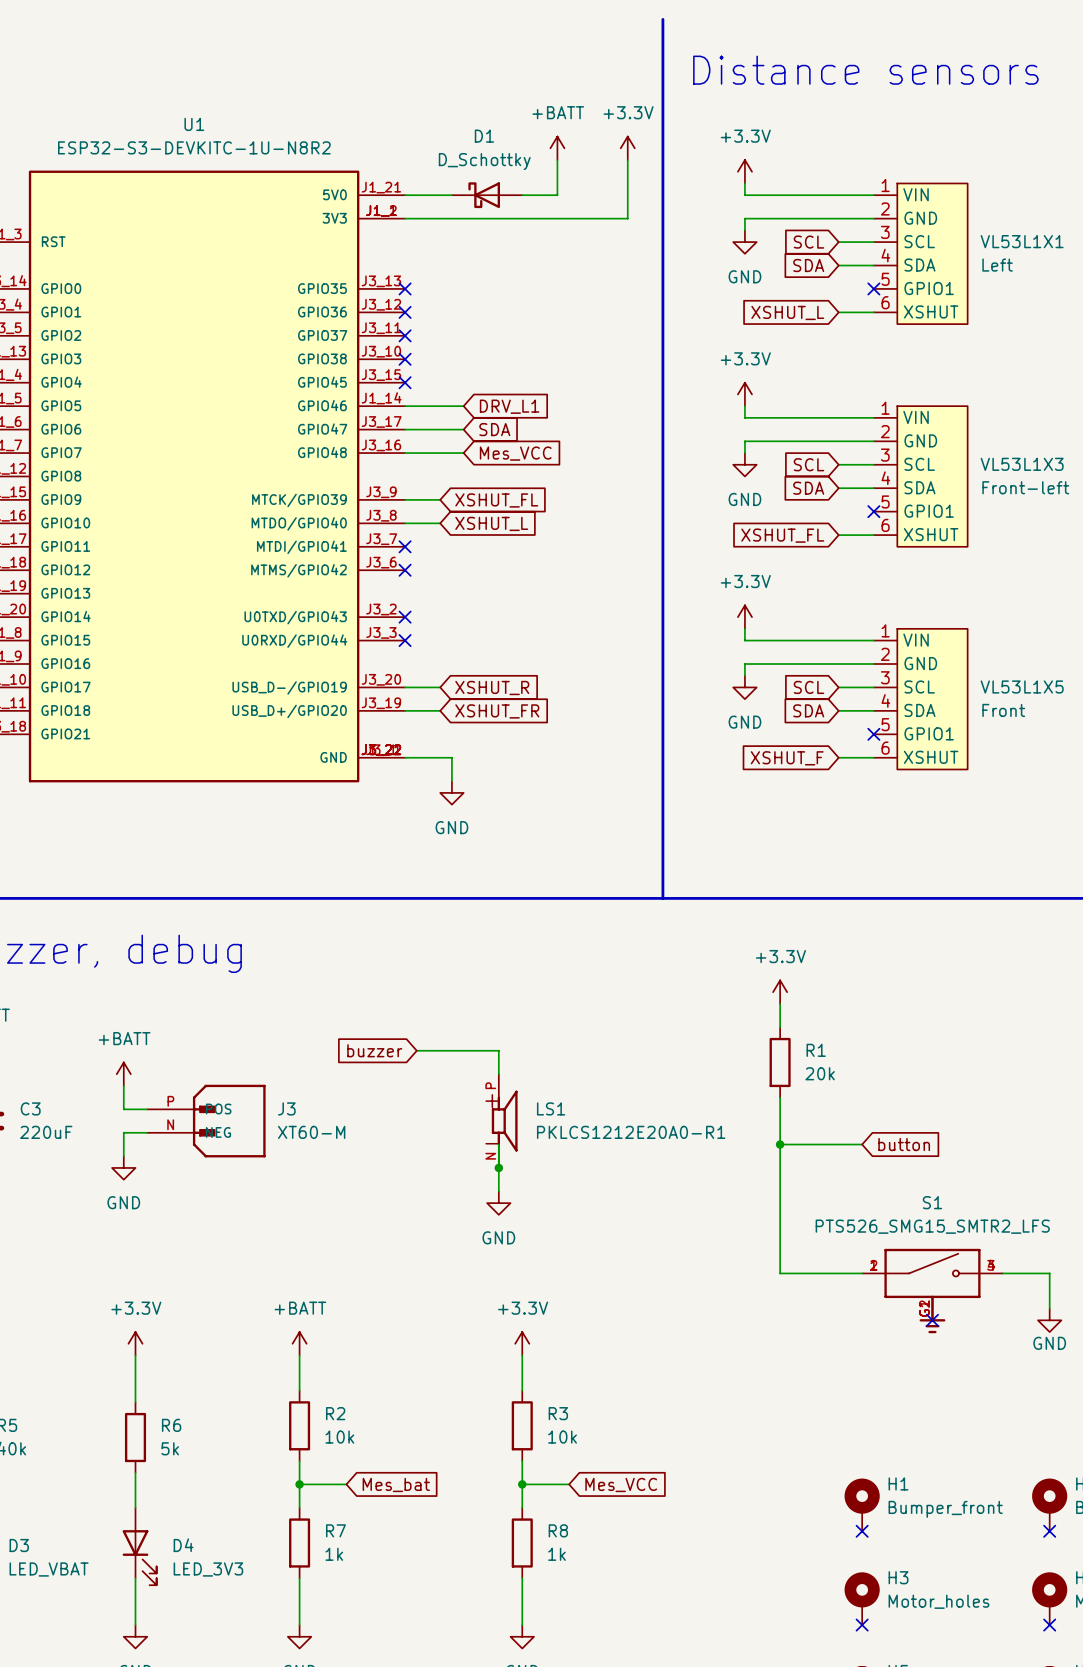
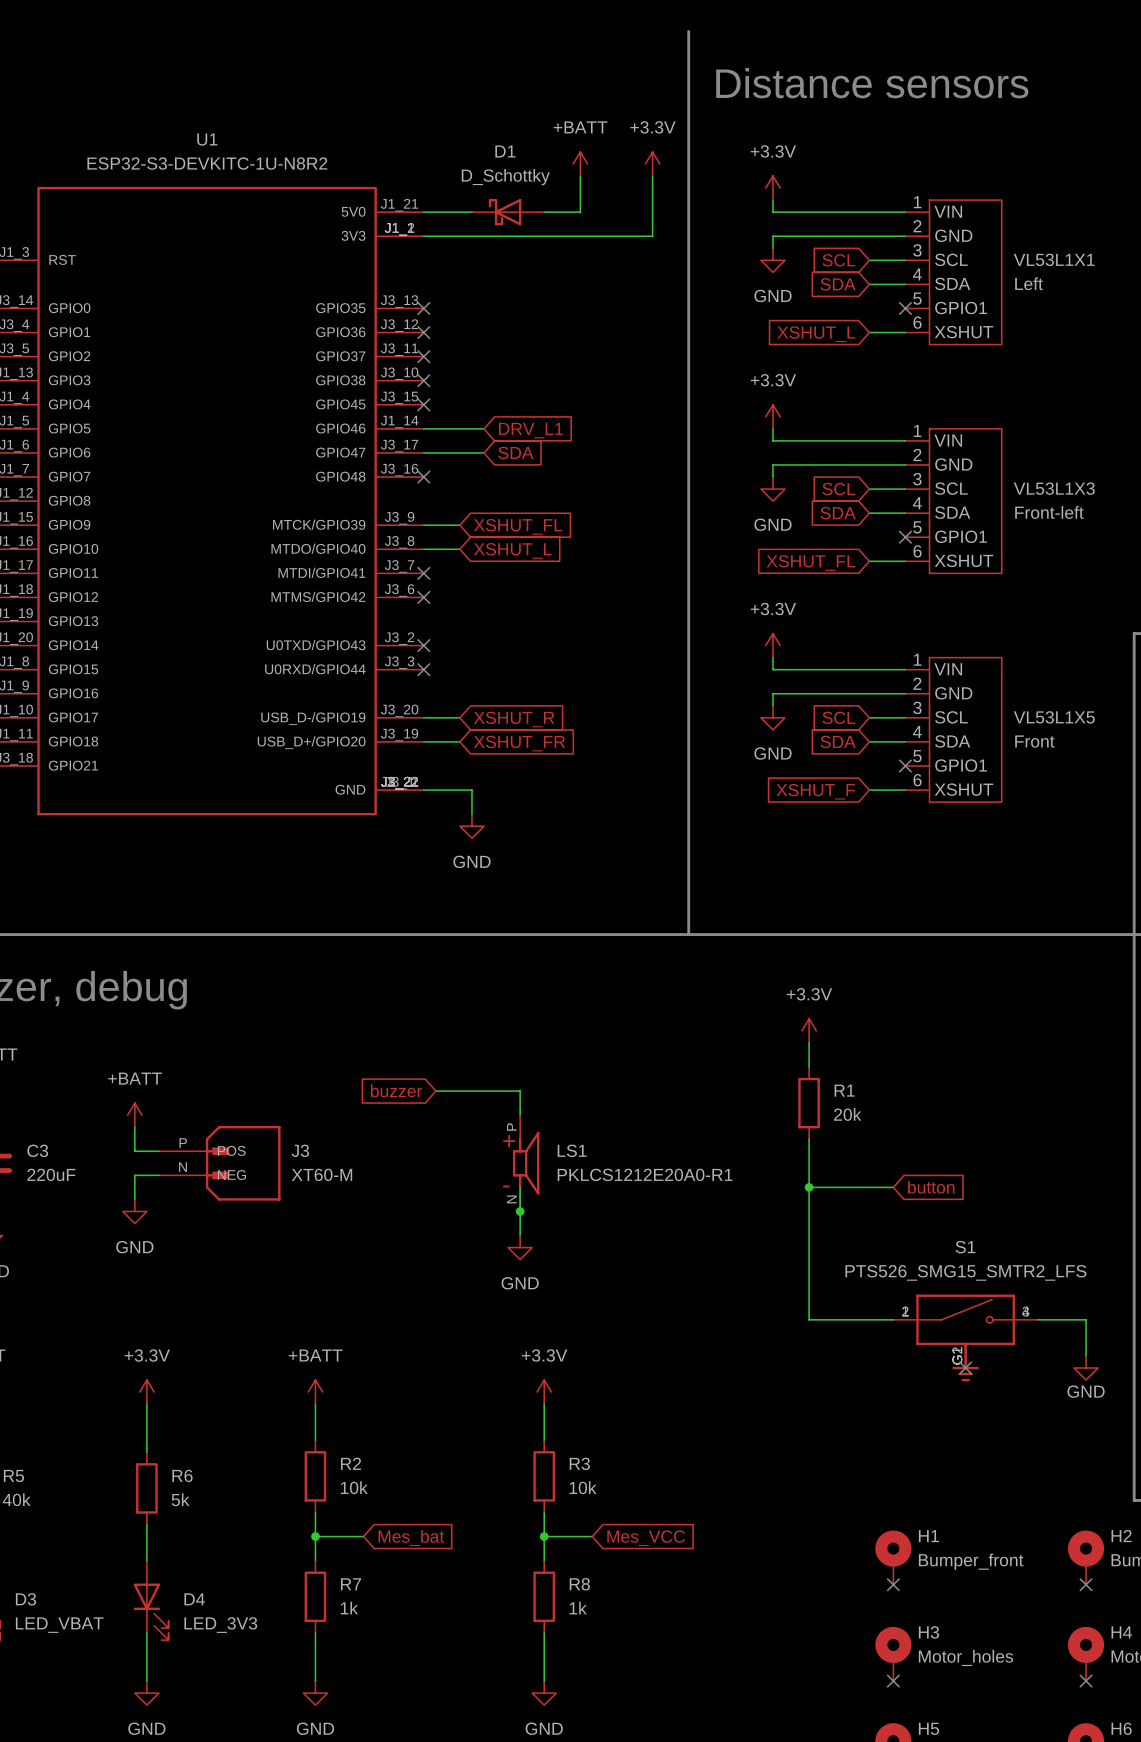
wire: (405, 453) (463, 453) -> none
no-connect mark: none -> (423, 477)
global label: Mes_VCC (515, 453) -> none

